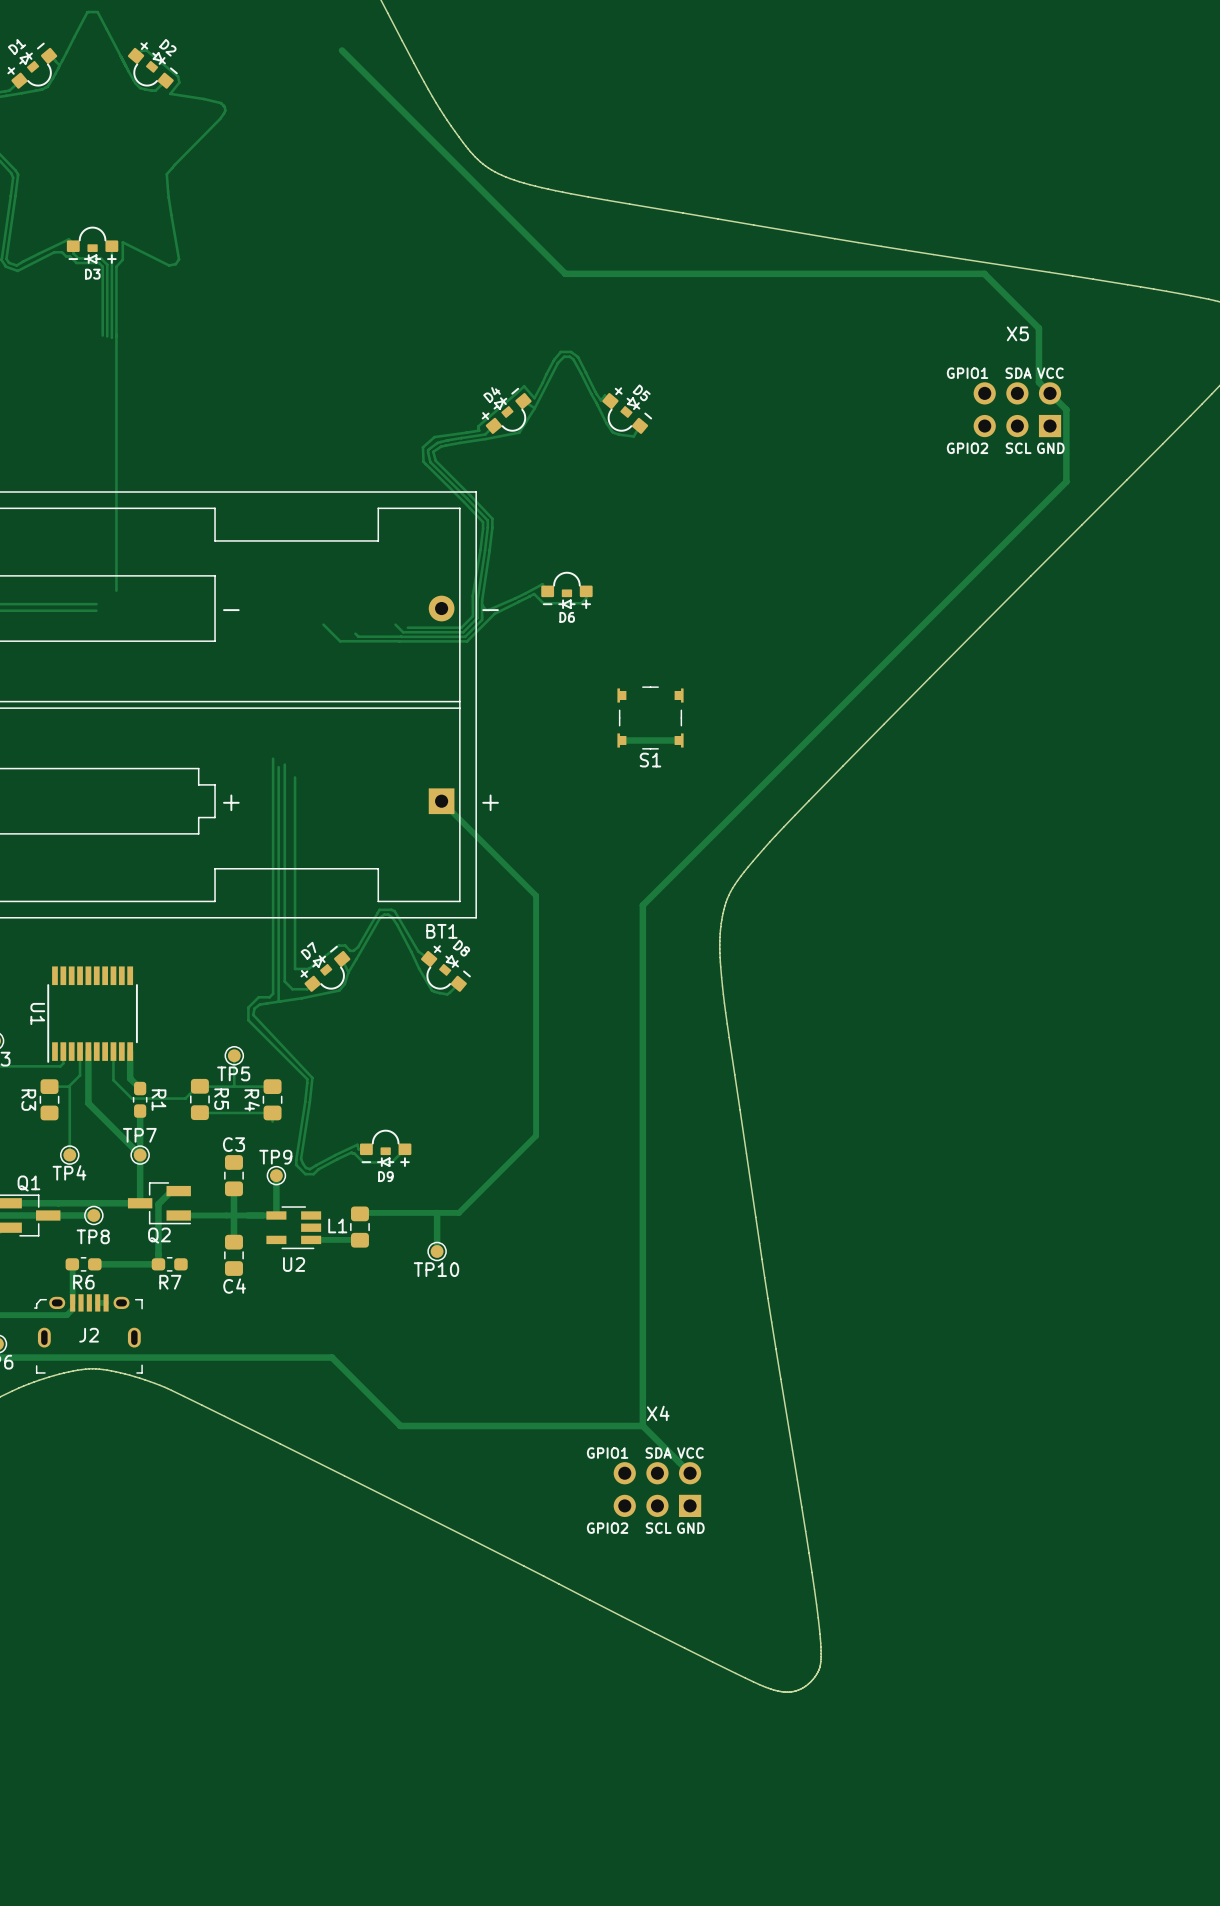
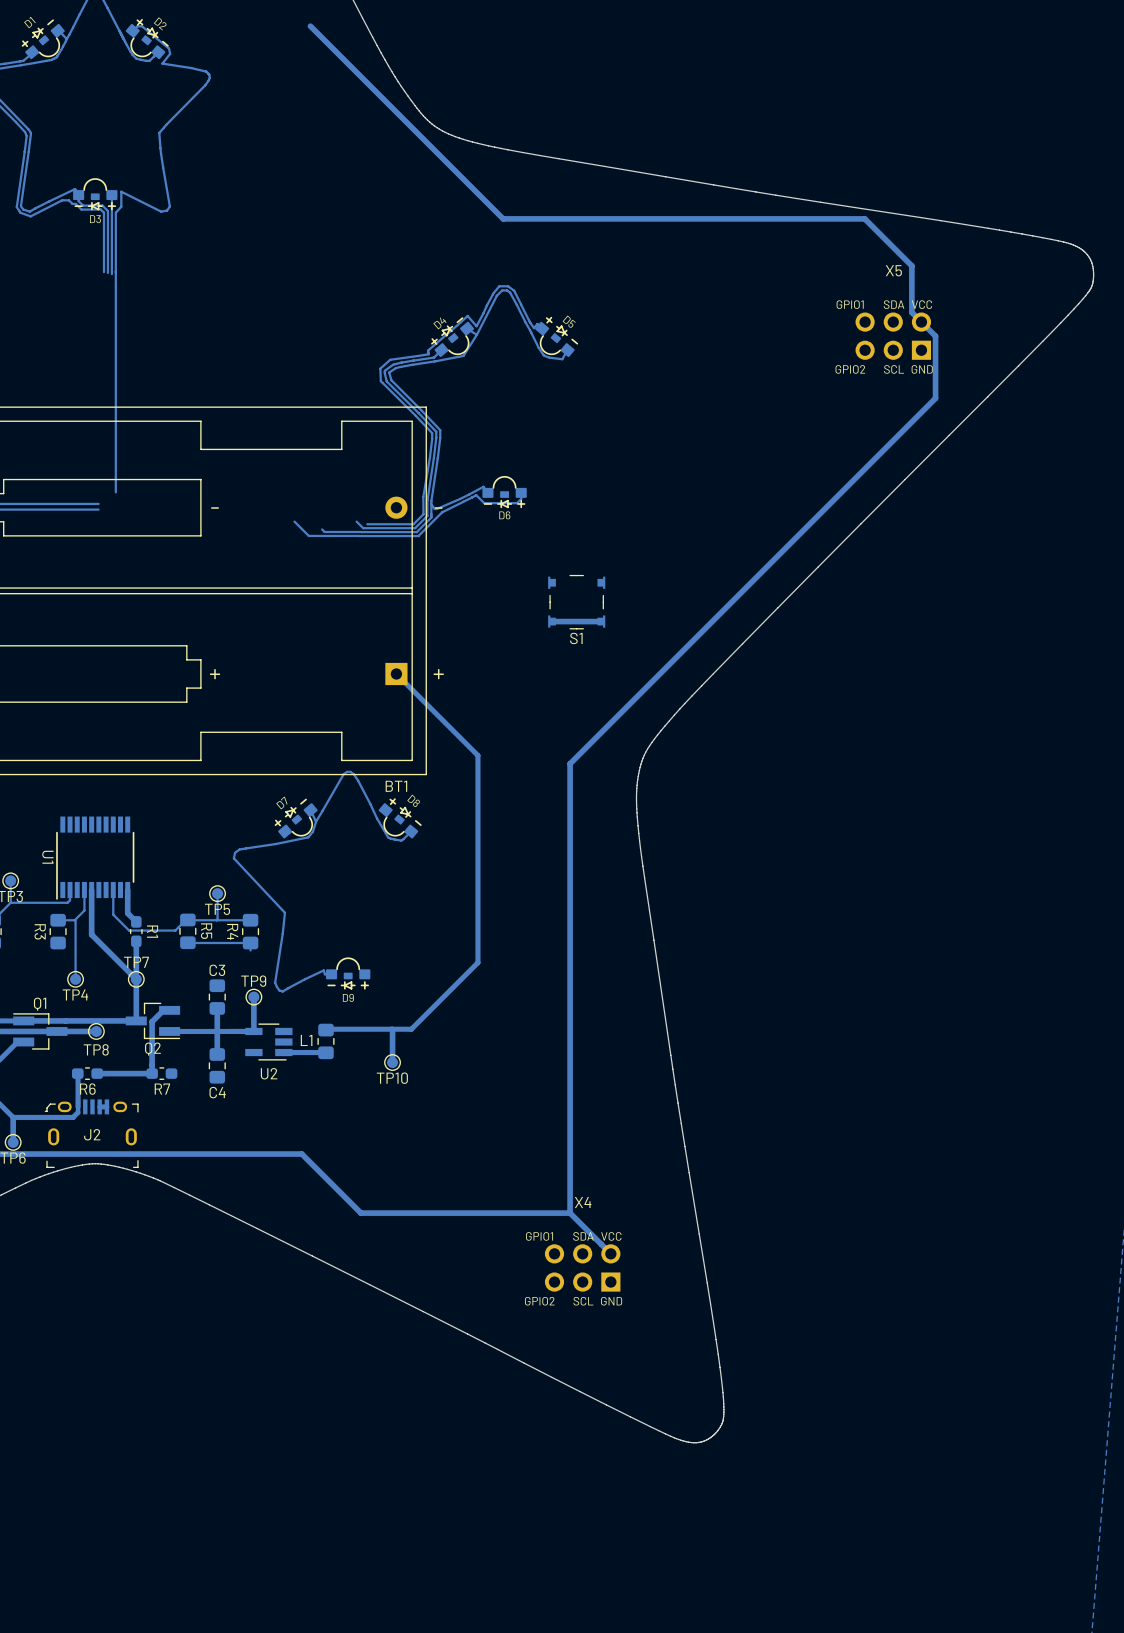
track: (273, 758) (273, 993) (269, 997) (258, 997) (248, 1007) (248, 1020) (307, 1079) (296, 1165) (305, 1174) (313, 1174) (318, 1169) (351, 1152) (363, 1162) (391, 1162) (404, 1149) -> none
track: (284, 764) (284, 981) (292, 989) (307, 989) (312, 983) -> none
track: (278, 767) (278, 1001) -> none
track: (295, 777) (295, 968) (308, 968) -> none
track: (358, 947) (379, 909) (391, 909) (394, 911) (418, 951) (429, 959) -> none
track: (358, 947) (353, 950) (350, 950) (345, 945) (338, 945) (308, 968) -> none

